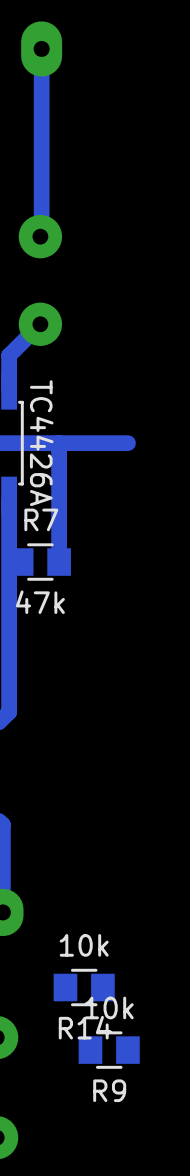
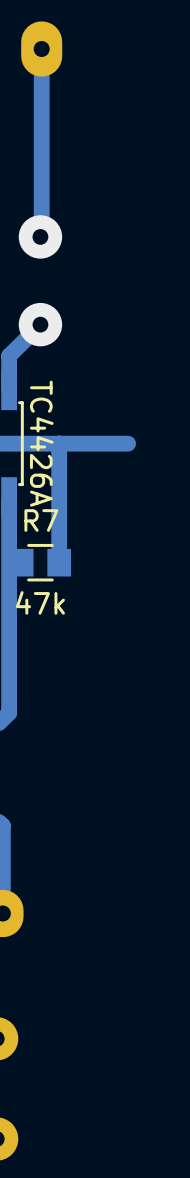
R14: 10k (84, 987) -> none
R9: 10k (109, 1050) -> none

